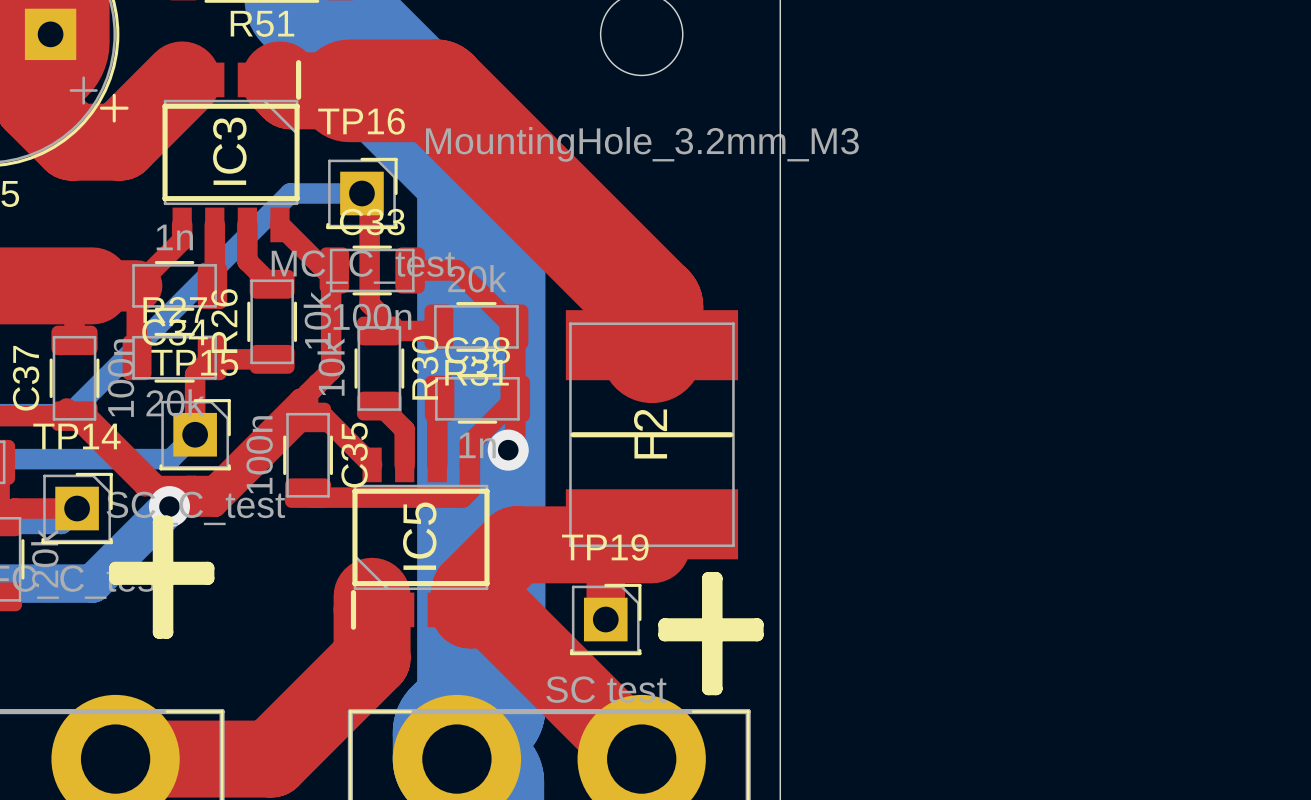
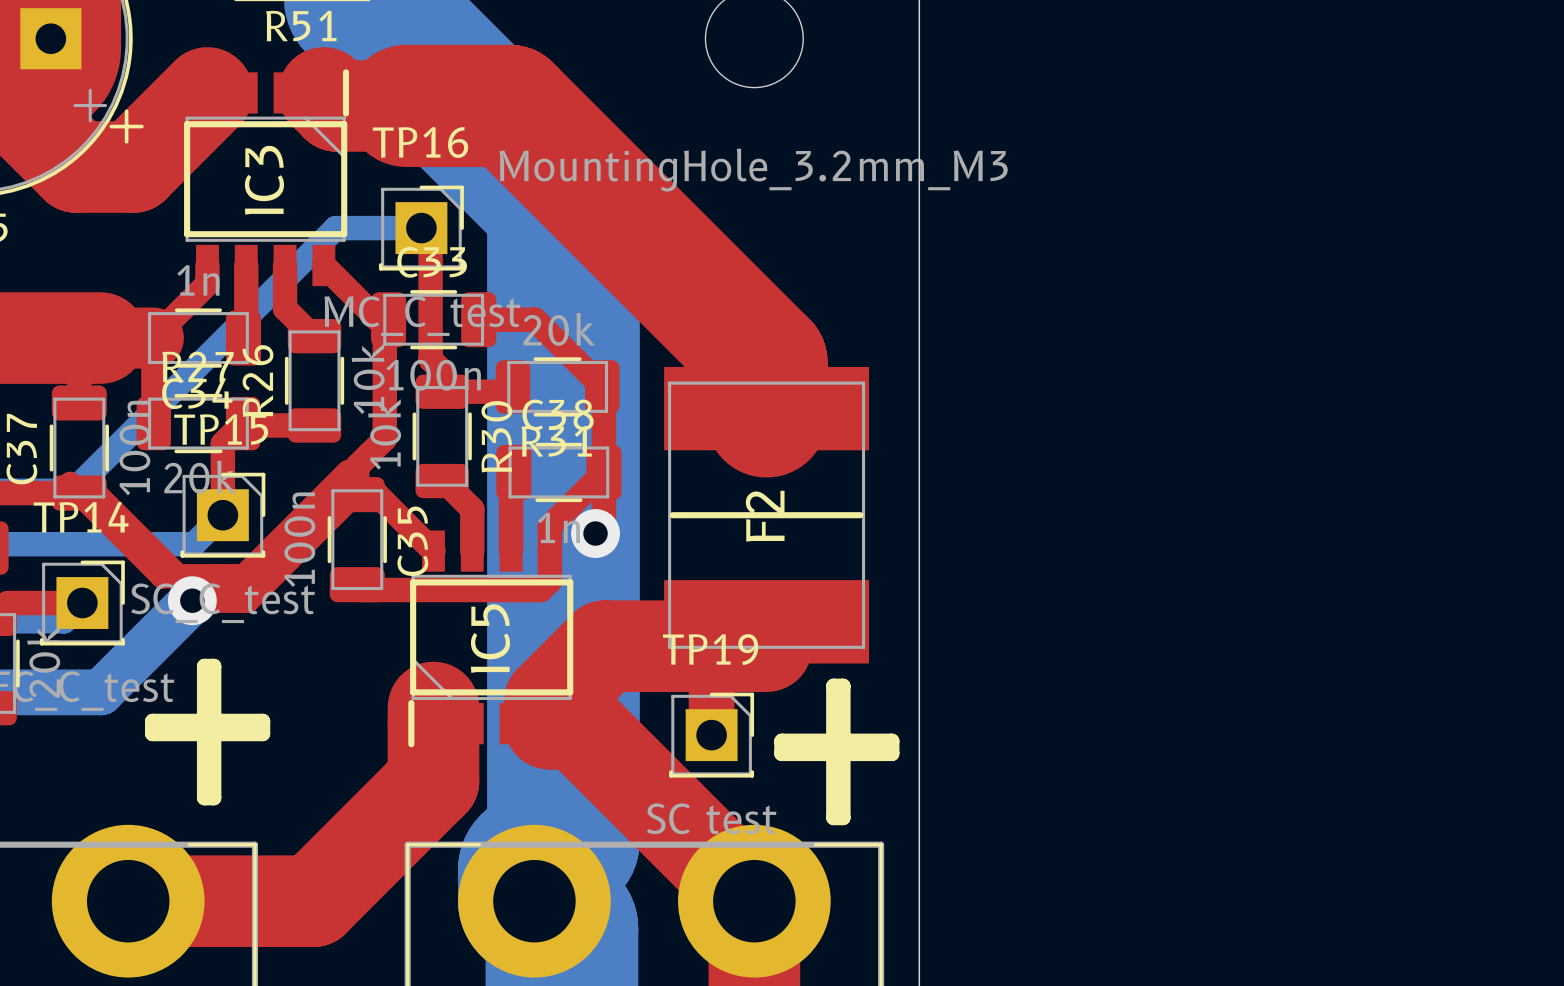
line: (159, 522) (166, 522) (166, 632) (159, 632) (159, 522) -> (204, 666) (213, 666) (213, 797) (204, 797) (204, 666)
line: (115, 568) (207, 568) (207, 578) (115, 578) (115, 568) -> (152, 721) (262, 721) (262, 733) (152, 733) (152, 721)

